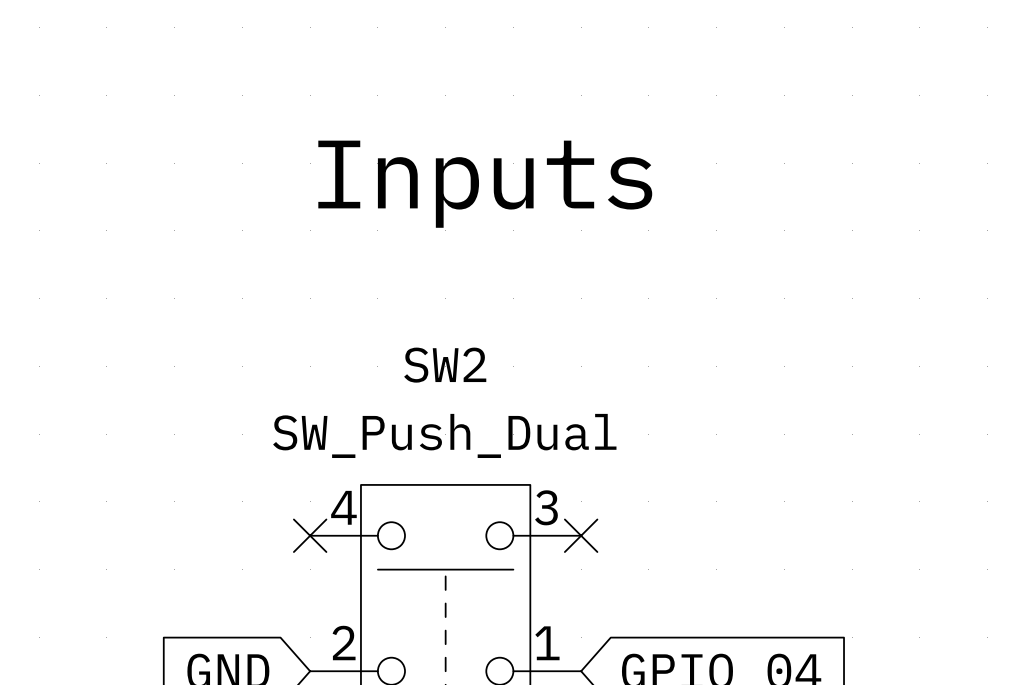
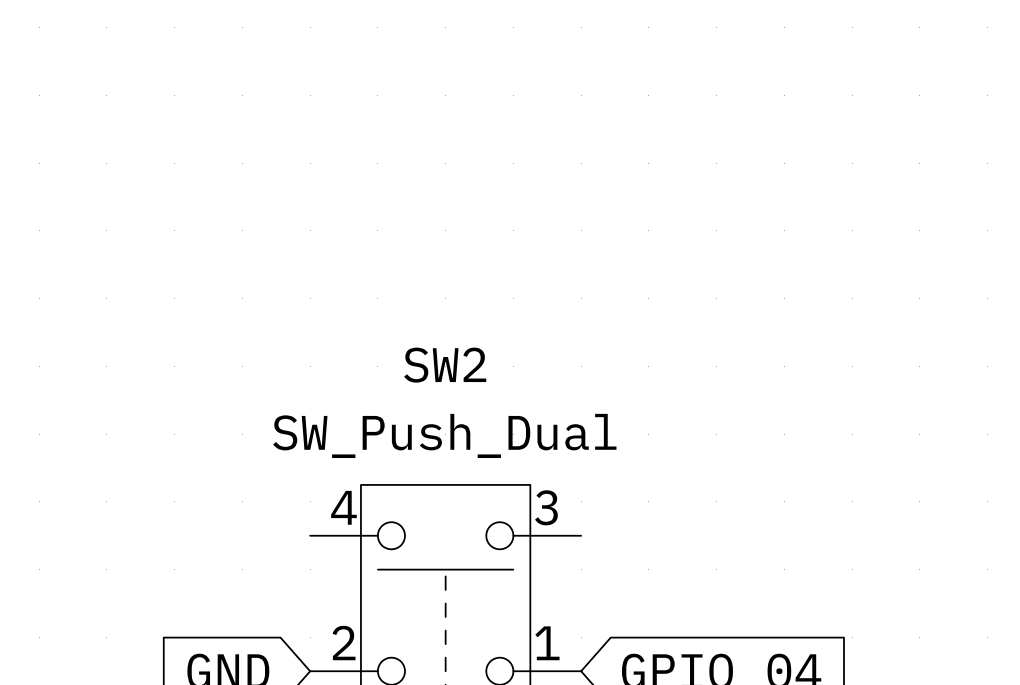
label: Inputs (485, 184) -> none
no-connect mark: (310, 535) -> none
no-connect mark: (581, 535) -> none

